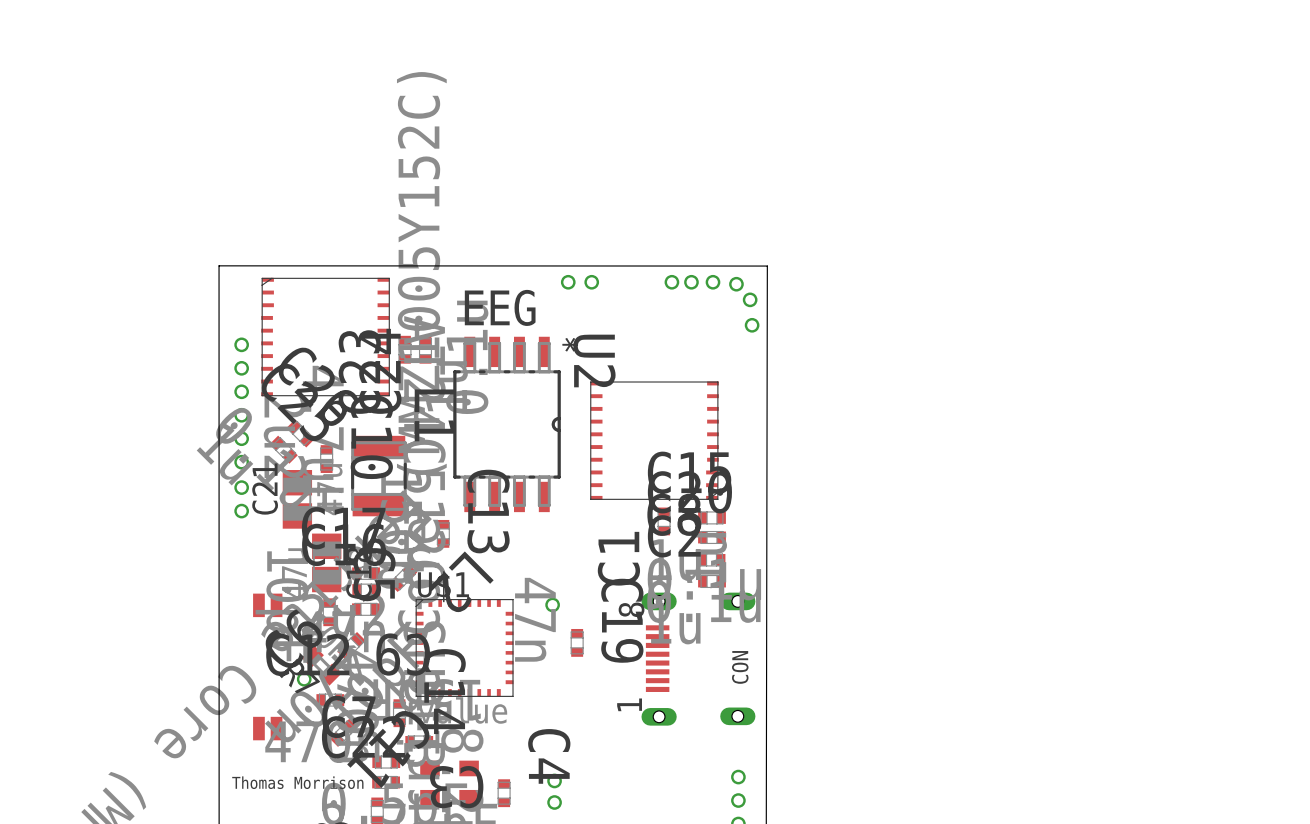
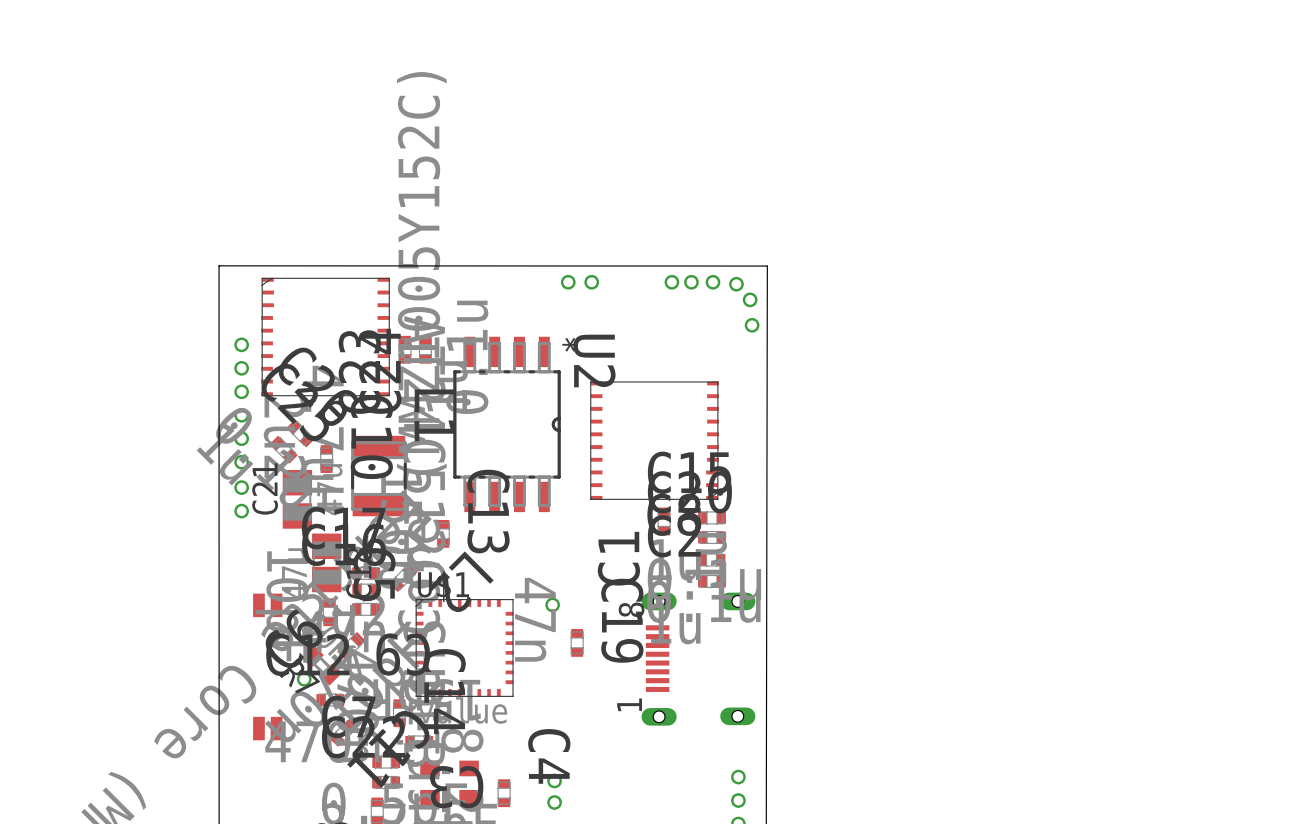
text: EEG (500, 307) -> none
text: CON (740, 667) -> none
text: Thomas Morrison (297, 782) -> none

